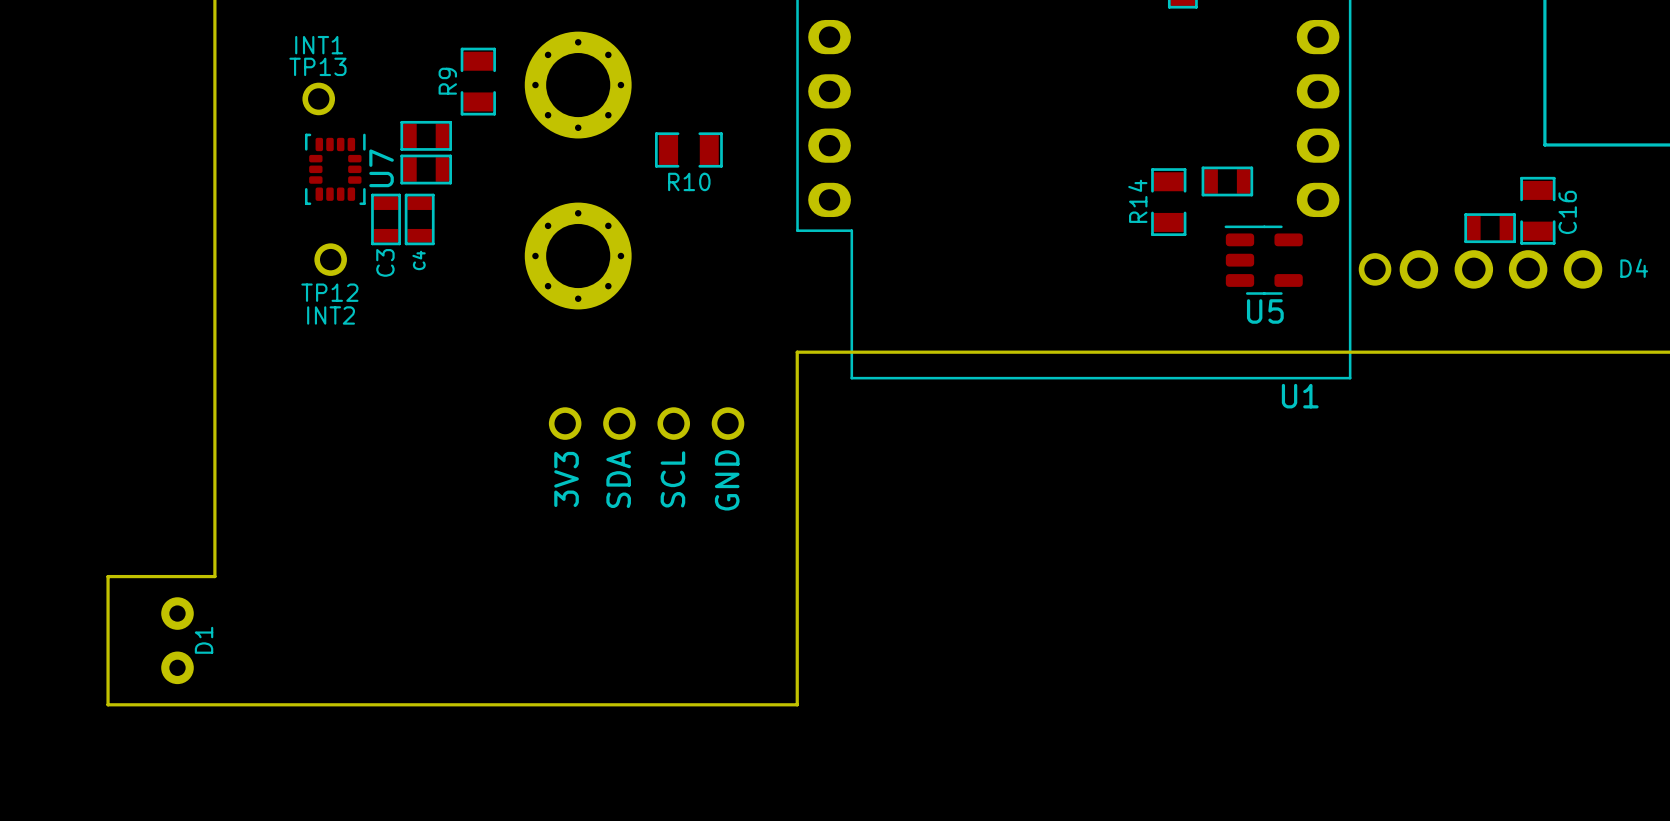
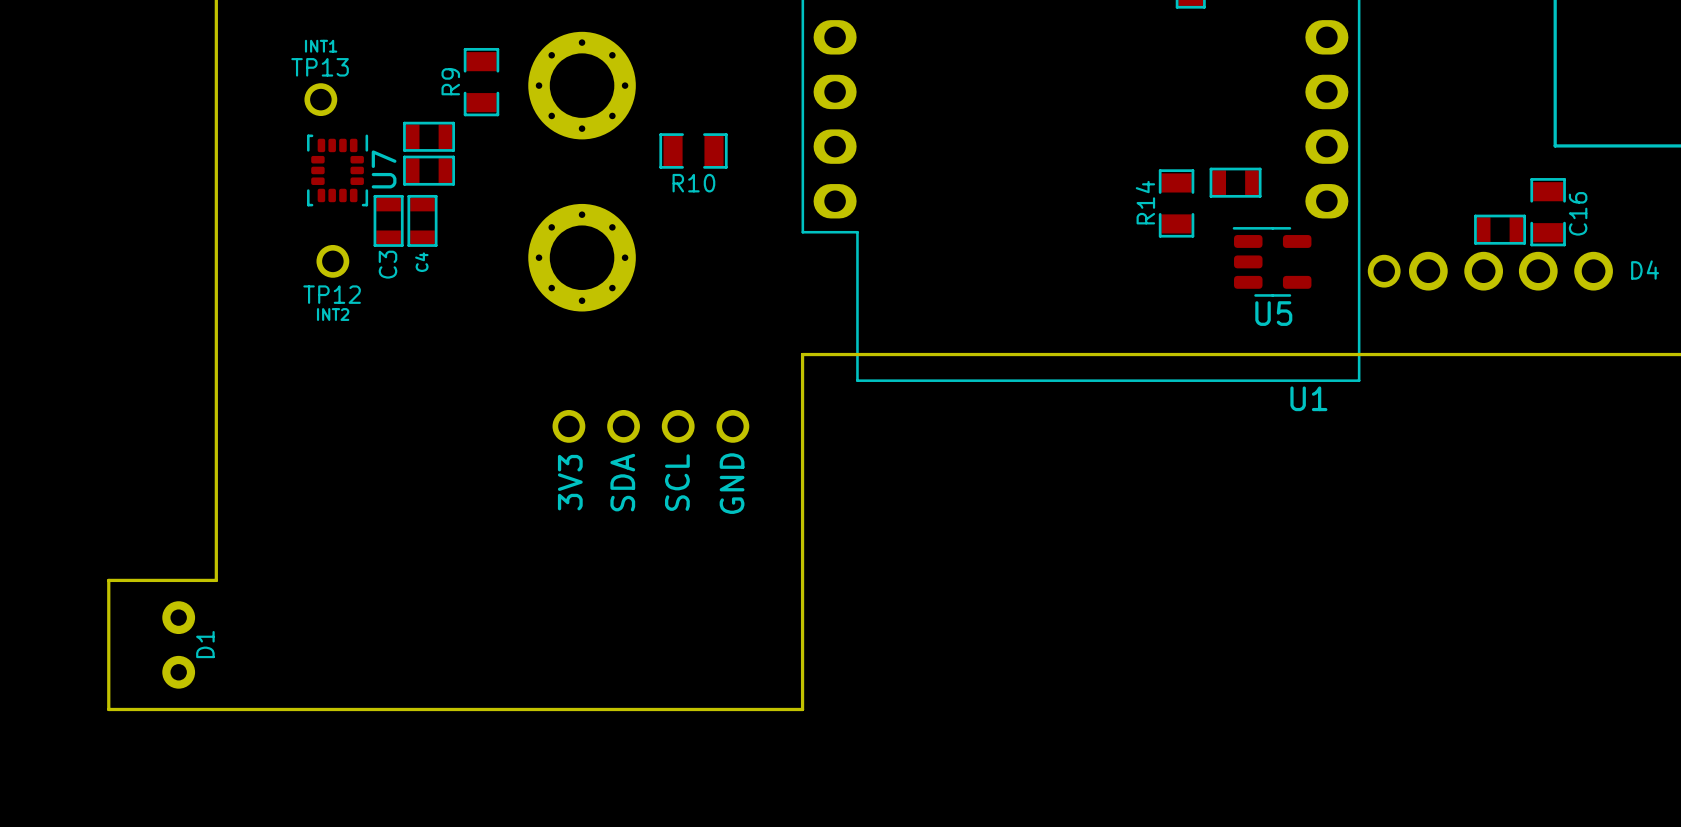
TP13 text: none -> INT1 (321, 46)
TP13 value: INT1 (319, 45) -> none
TP12 text: none -> INT2 (333, 314)
TP12 value: INT2 (331, 315) -> none

